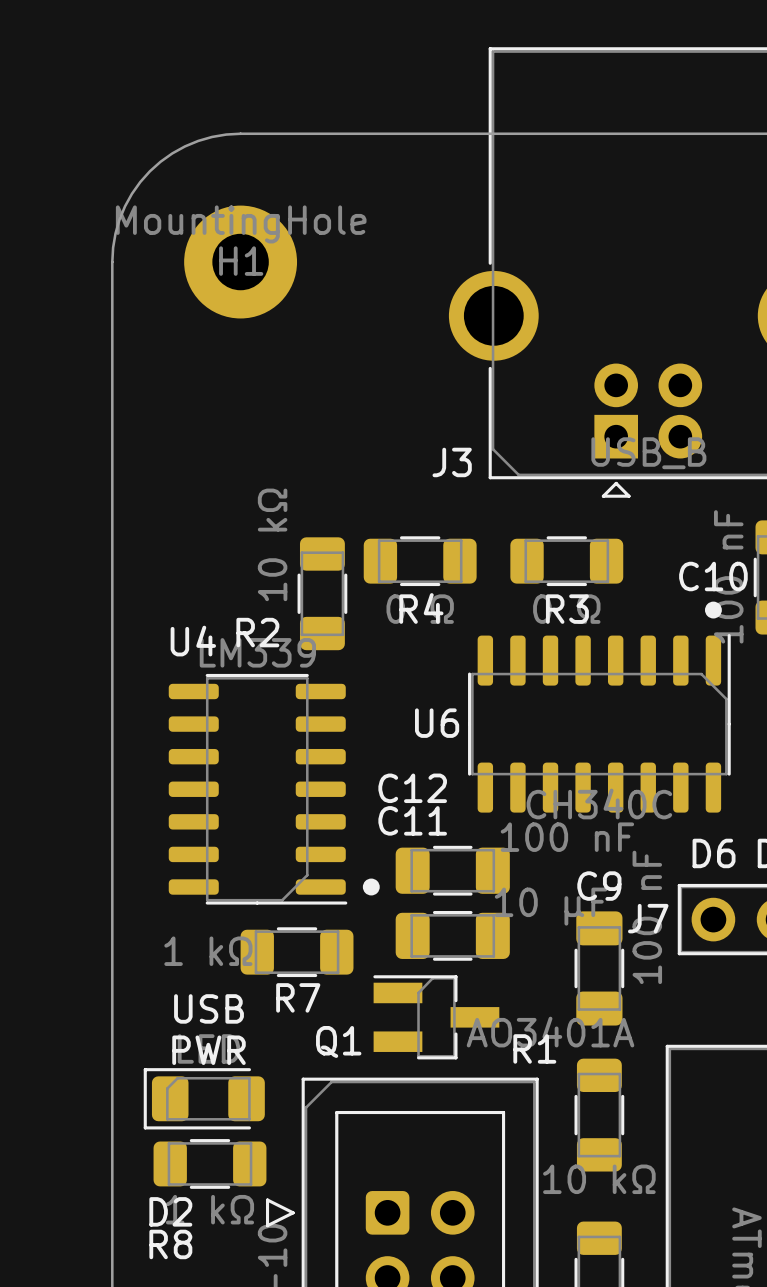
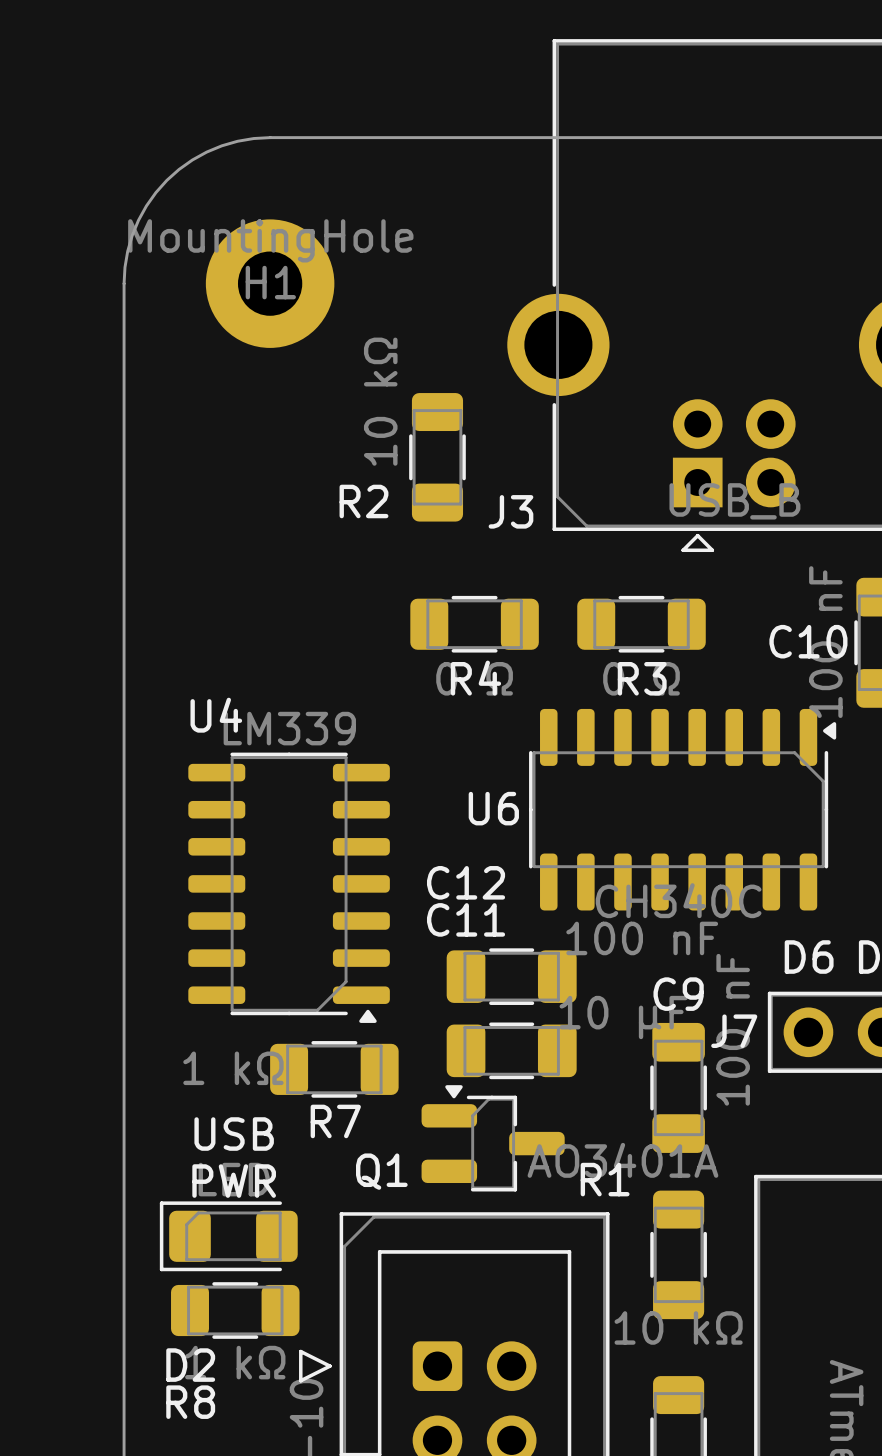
R2 position: (322, 593) -> (437, 457)
drawing: [704, 601, 722, 619] -> none
U6 footprint: [468, 634, 731, 813] -> [529, 708, 837, 911]
U4 footprint: [168, 673, 348, 905] -> [188, 752, 390, 1023]
drawing: [362, 878, 380, 896] -> none
Q1 footprint: [373, 975, 500, 1060] -> [421, 1085, 565, 1192]

